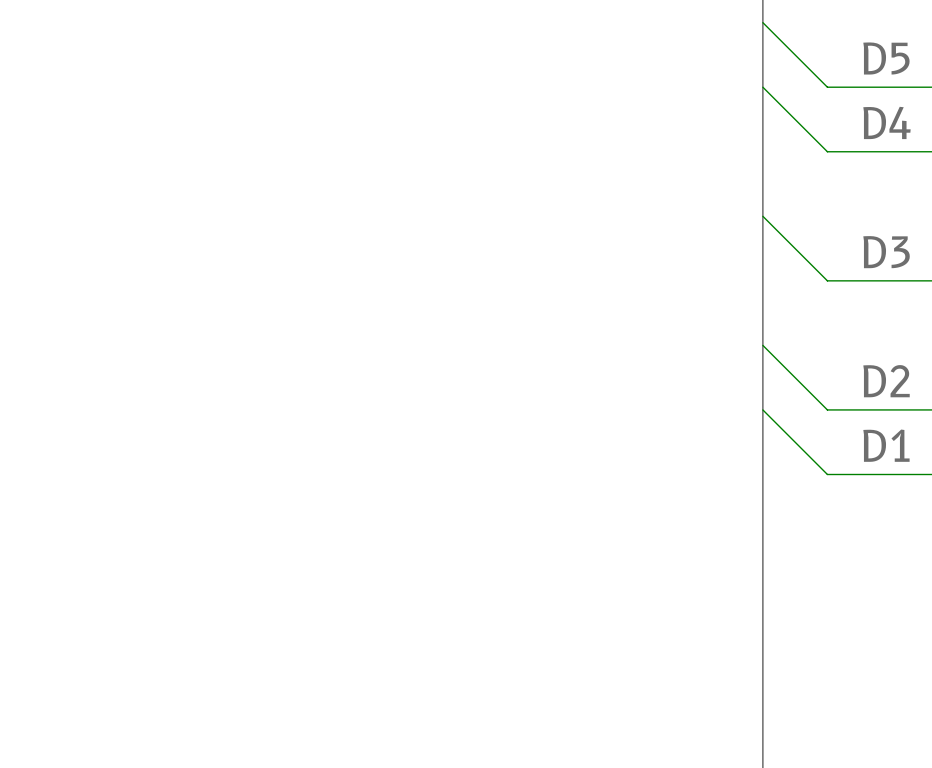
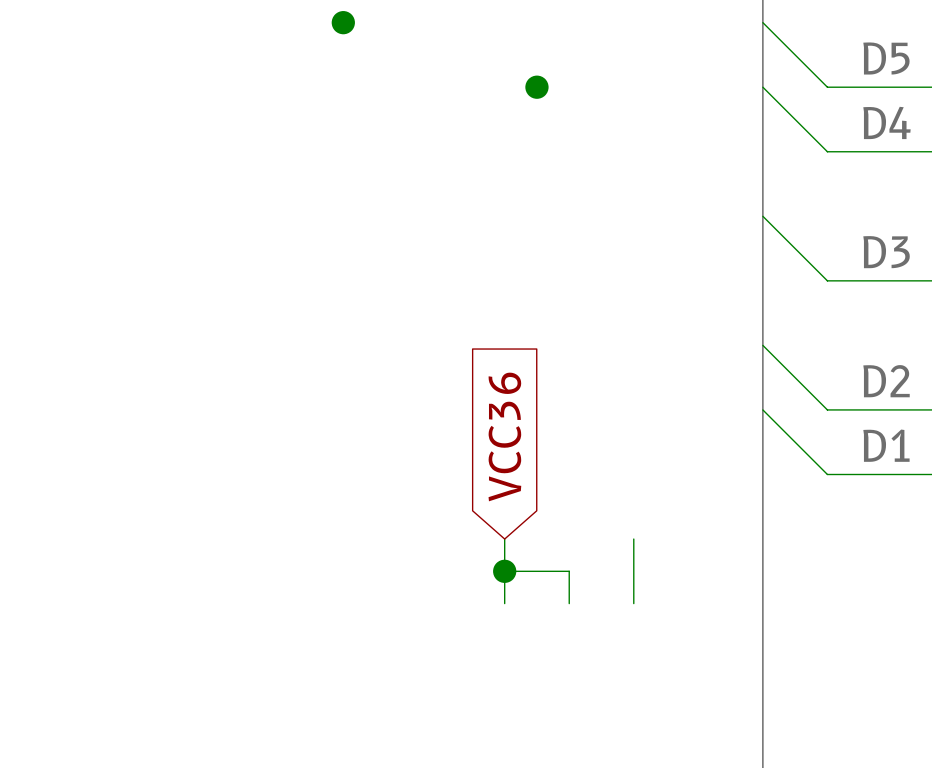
junction: none -> (343, 22)
junction: none -> (536, 87)
global label: none -> VCC36 (504, 436)
wire: none -> (504, 539) (504, 603)
wire: none -> (633, 539) (633, 603)
wire: none -> (504, 571) (569, 571) (569, 603)
junction: none -> (504, 571)

